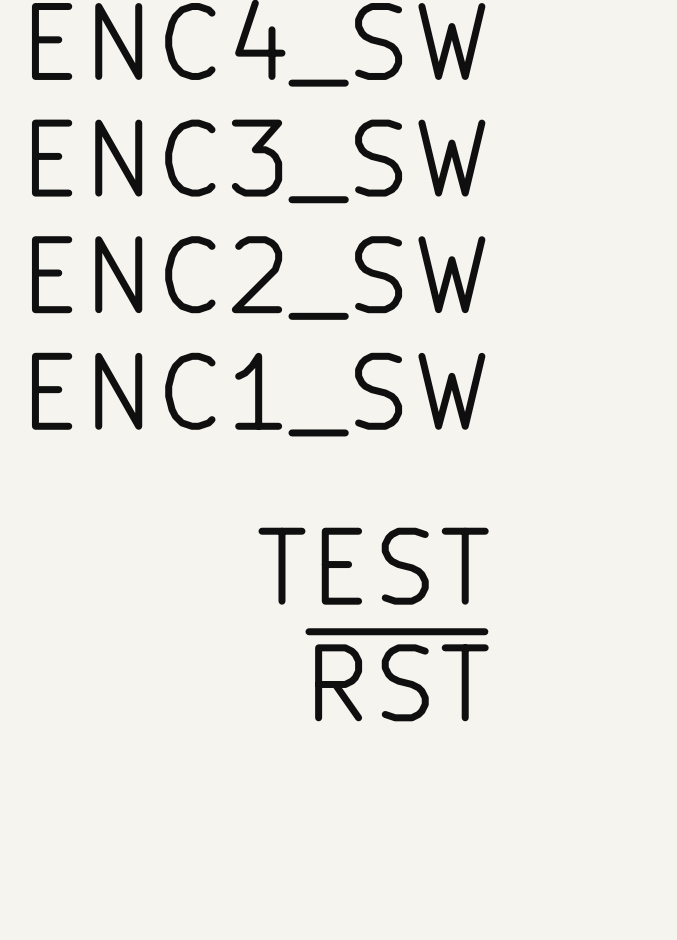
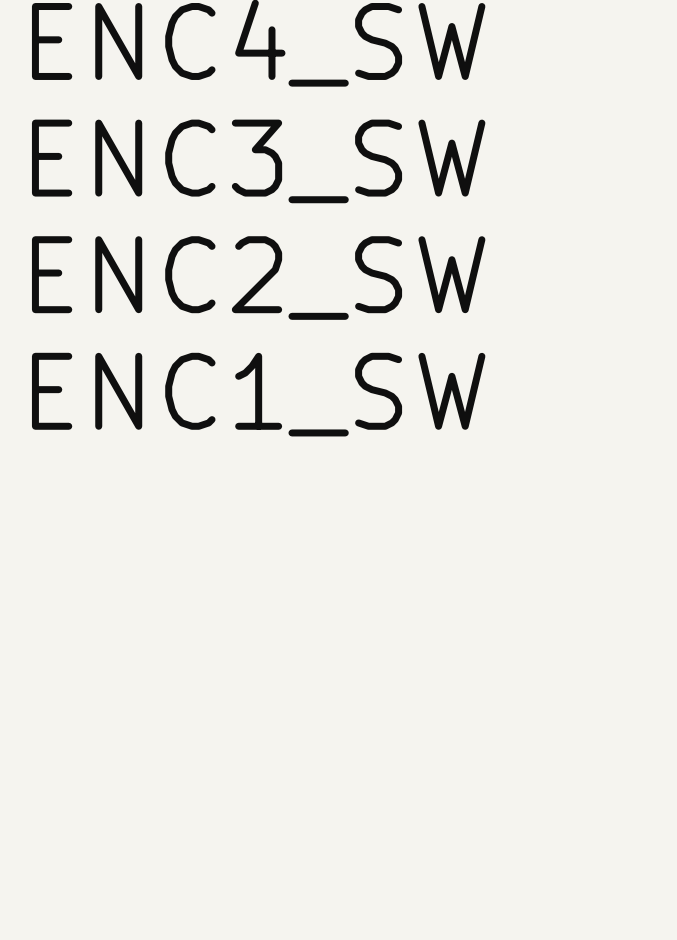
label: TEST (373, 566) -> none
label: ~{RST} (397, 674) -> none

